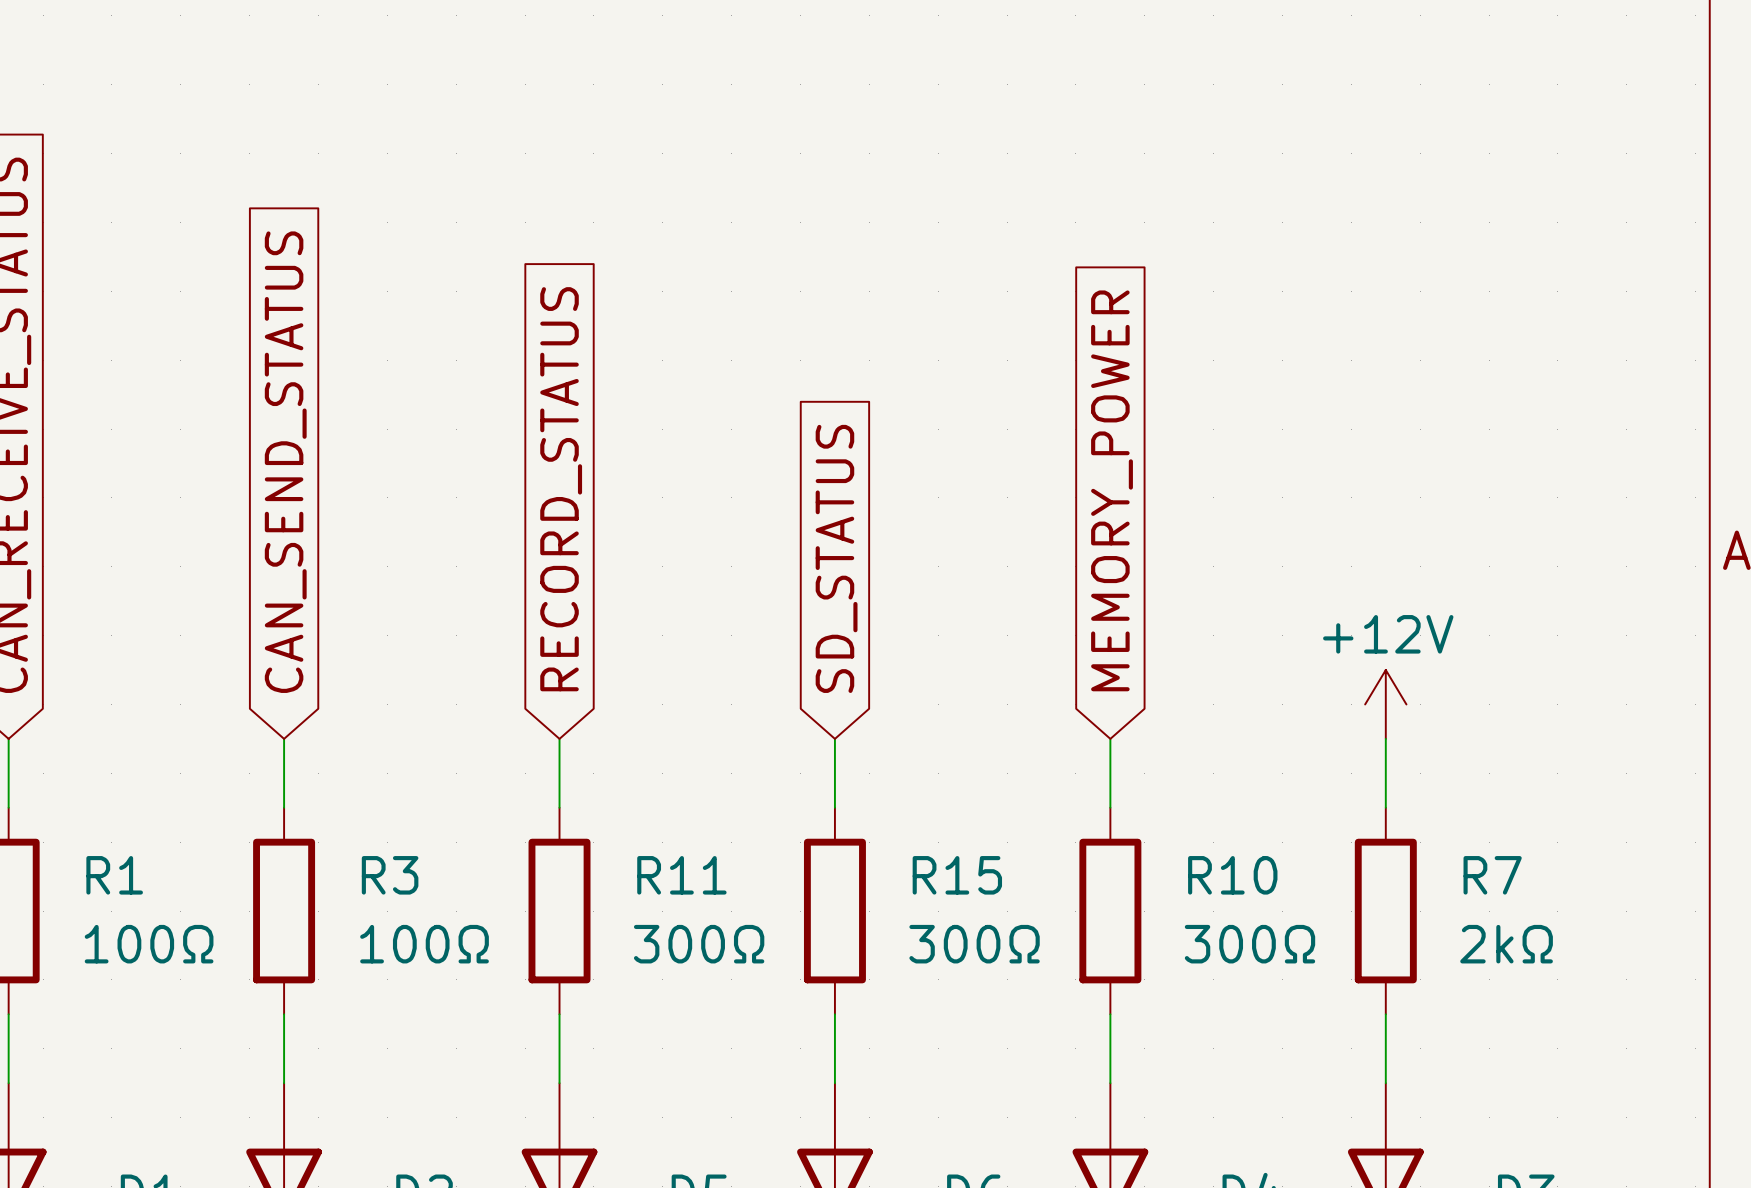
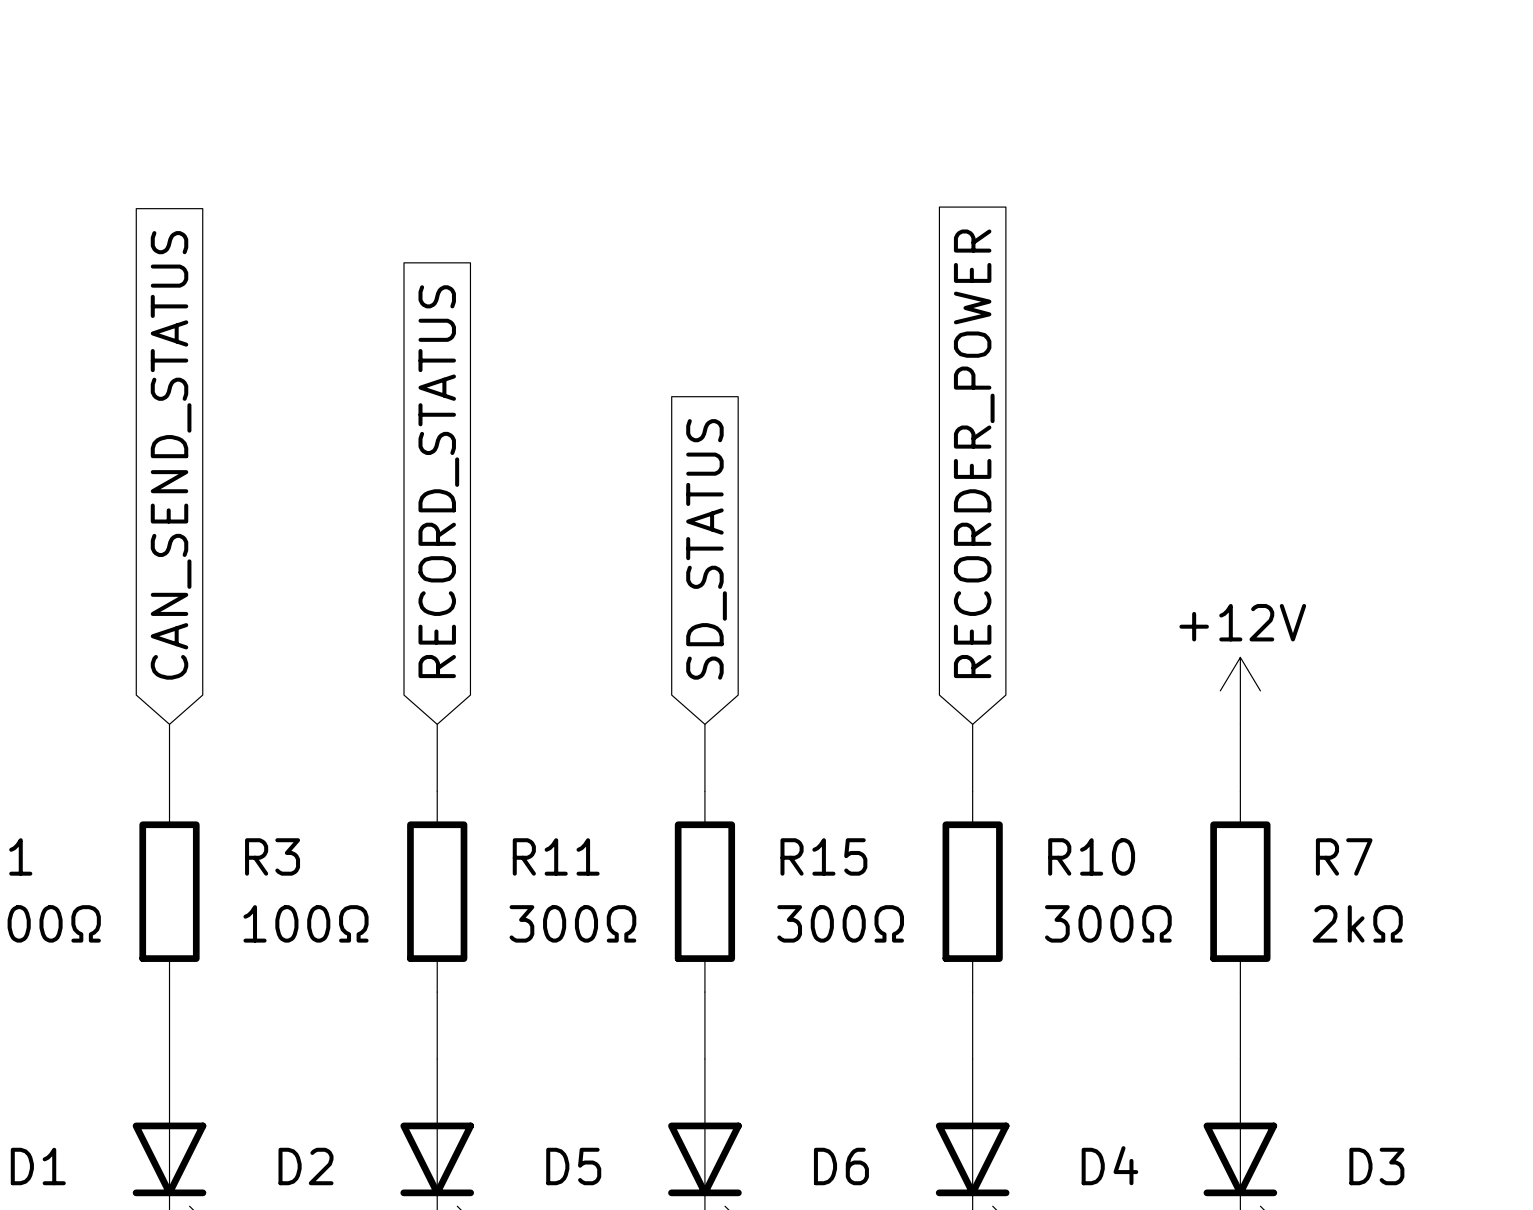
global label: MEMORY_POWER (1112, 490) -> RECORDER_POWER (974, 453)

